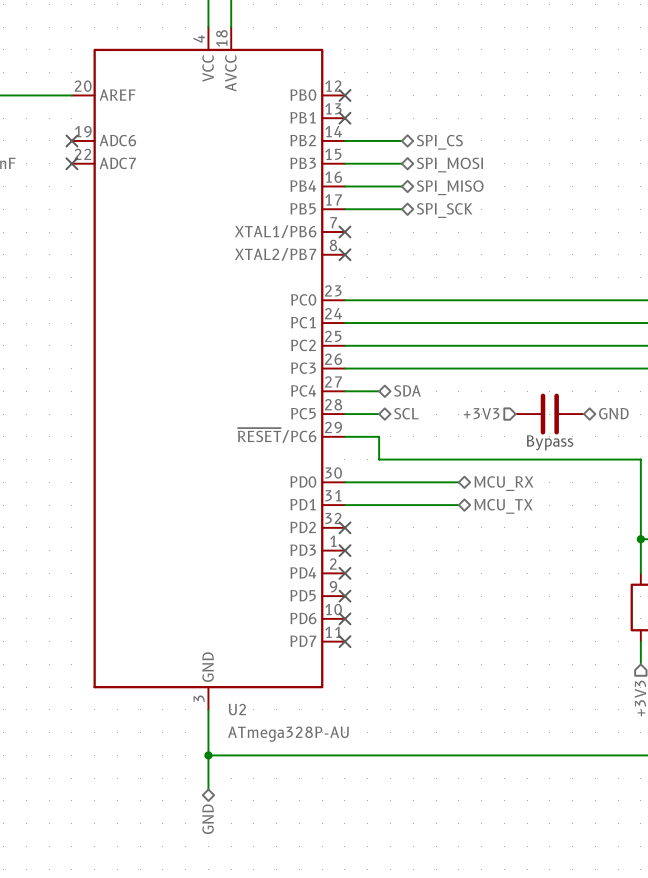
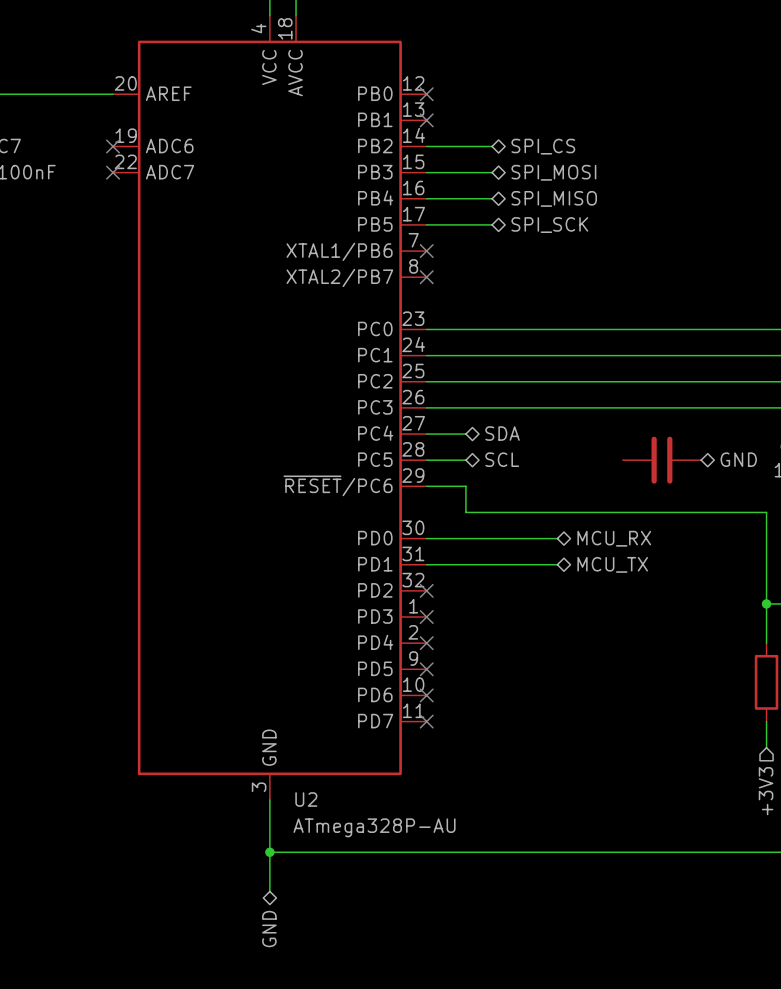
hierarchical label: +3V3 (481, 413) -> none
text: Bypass (550, 442) -> none

